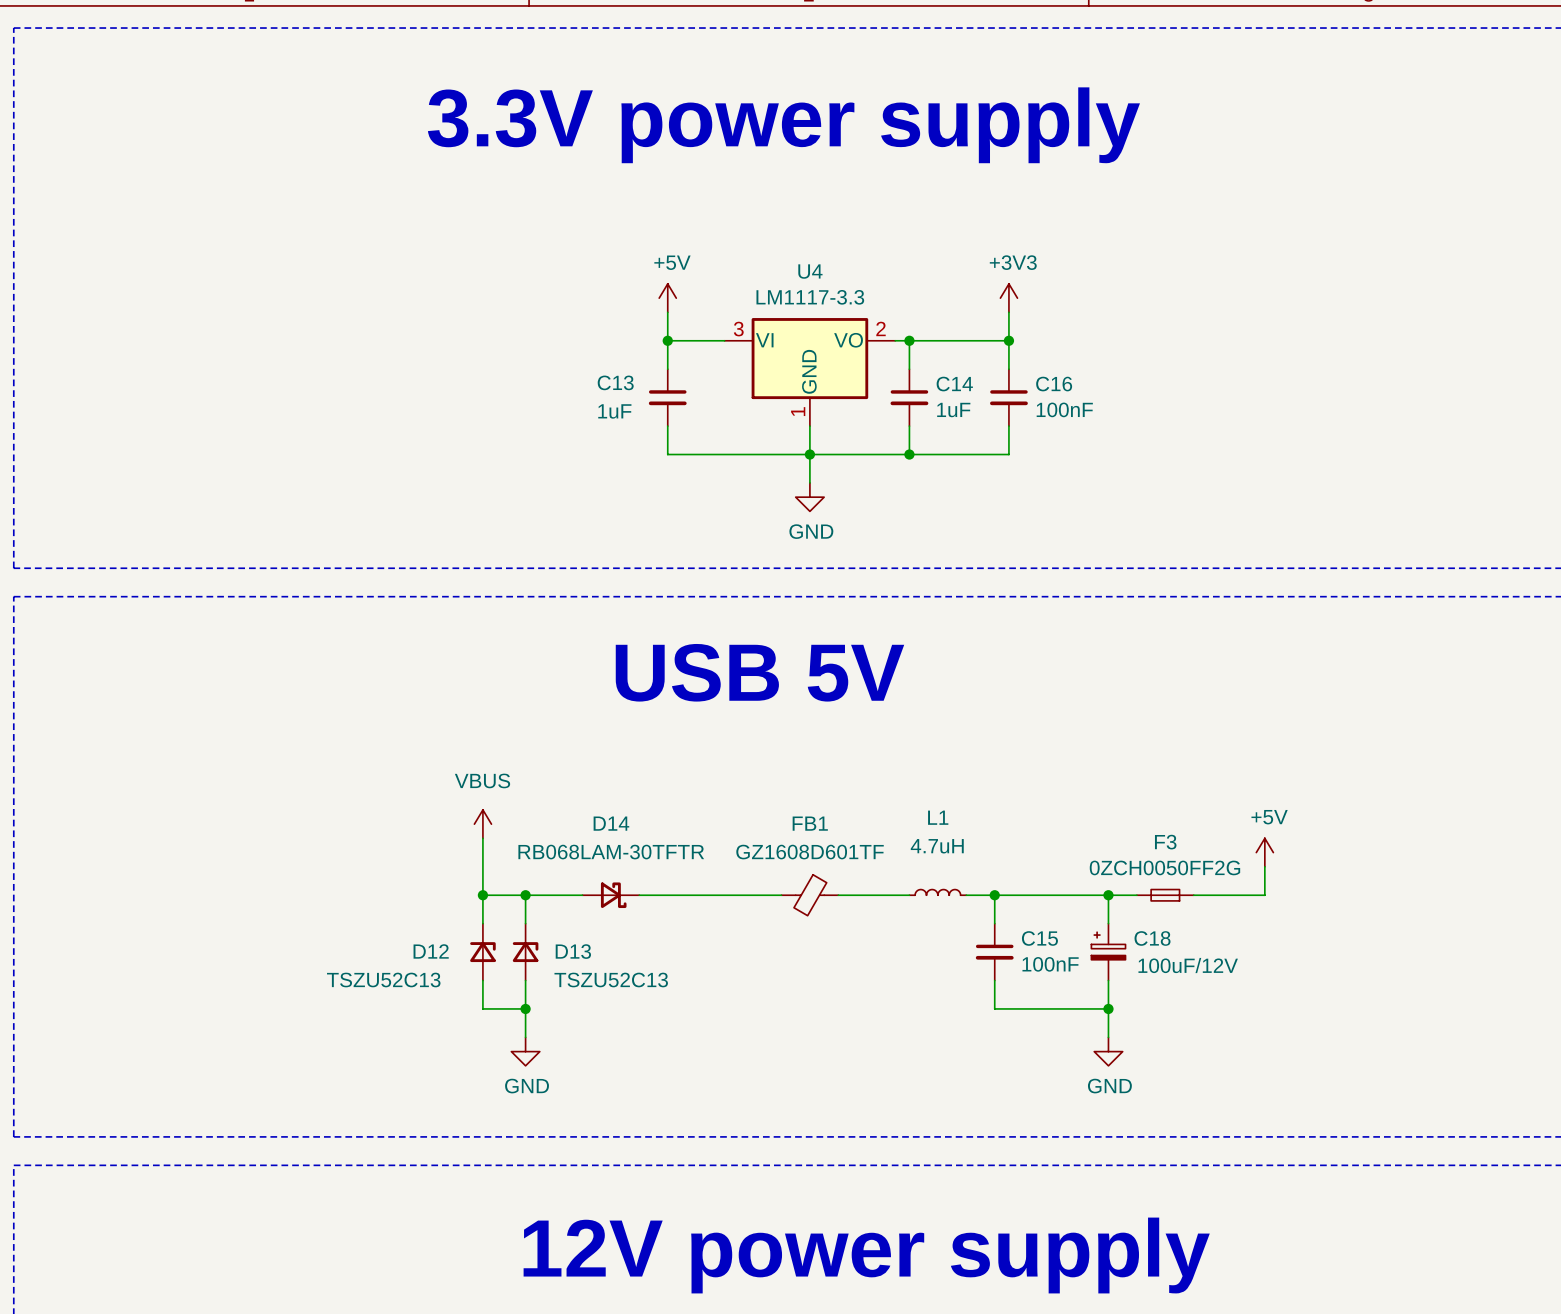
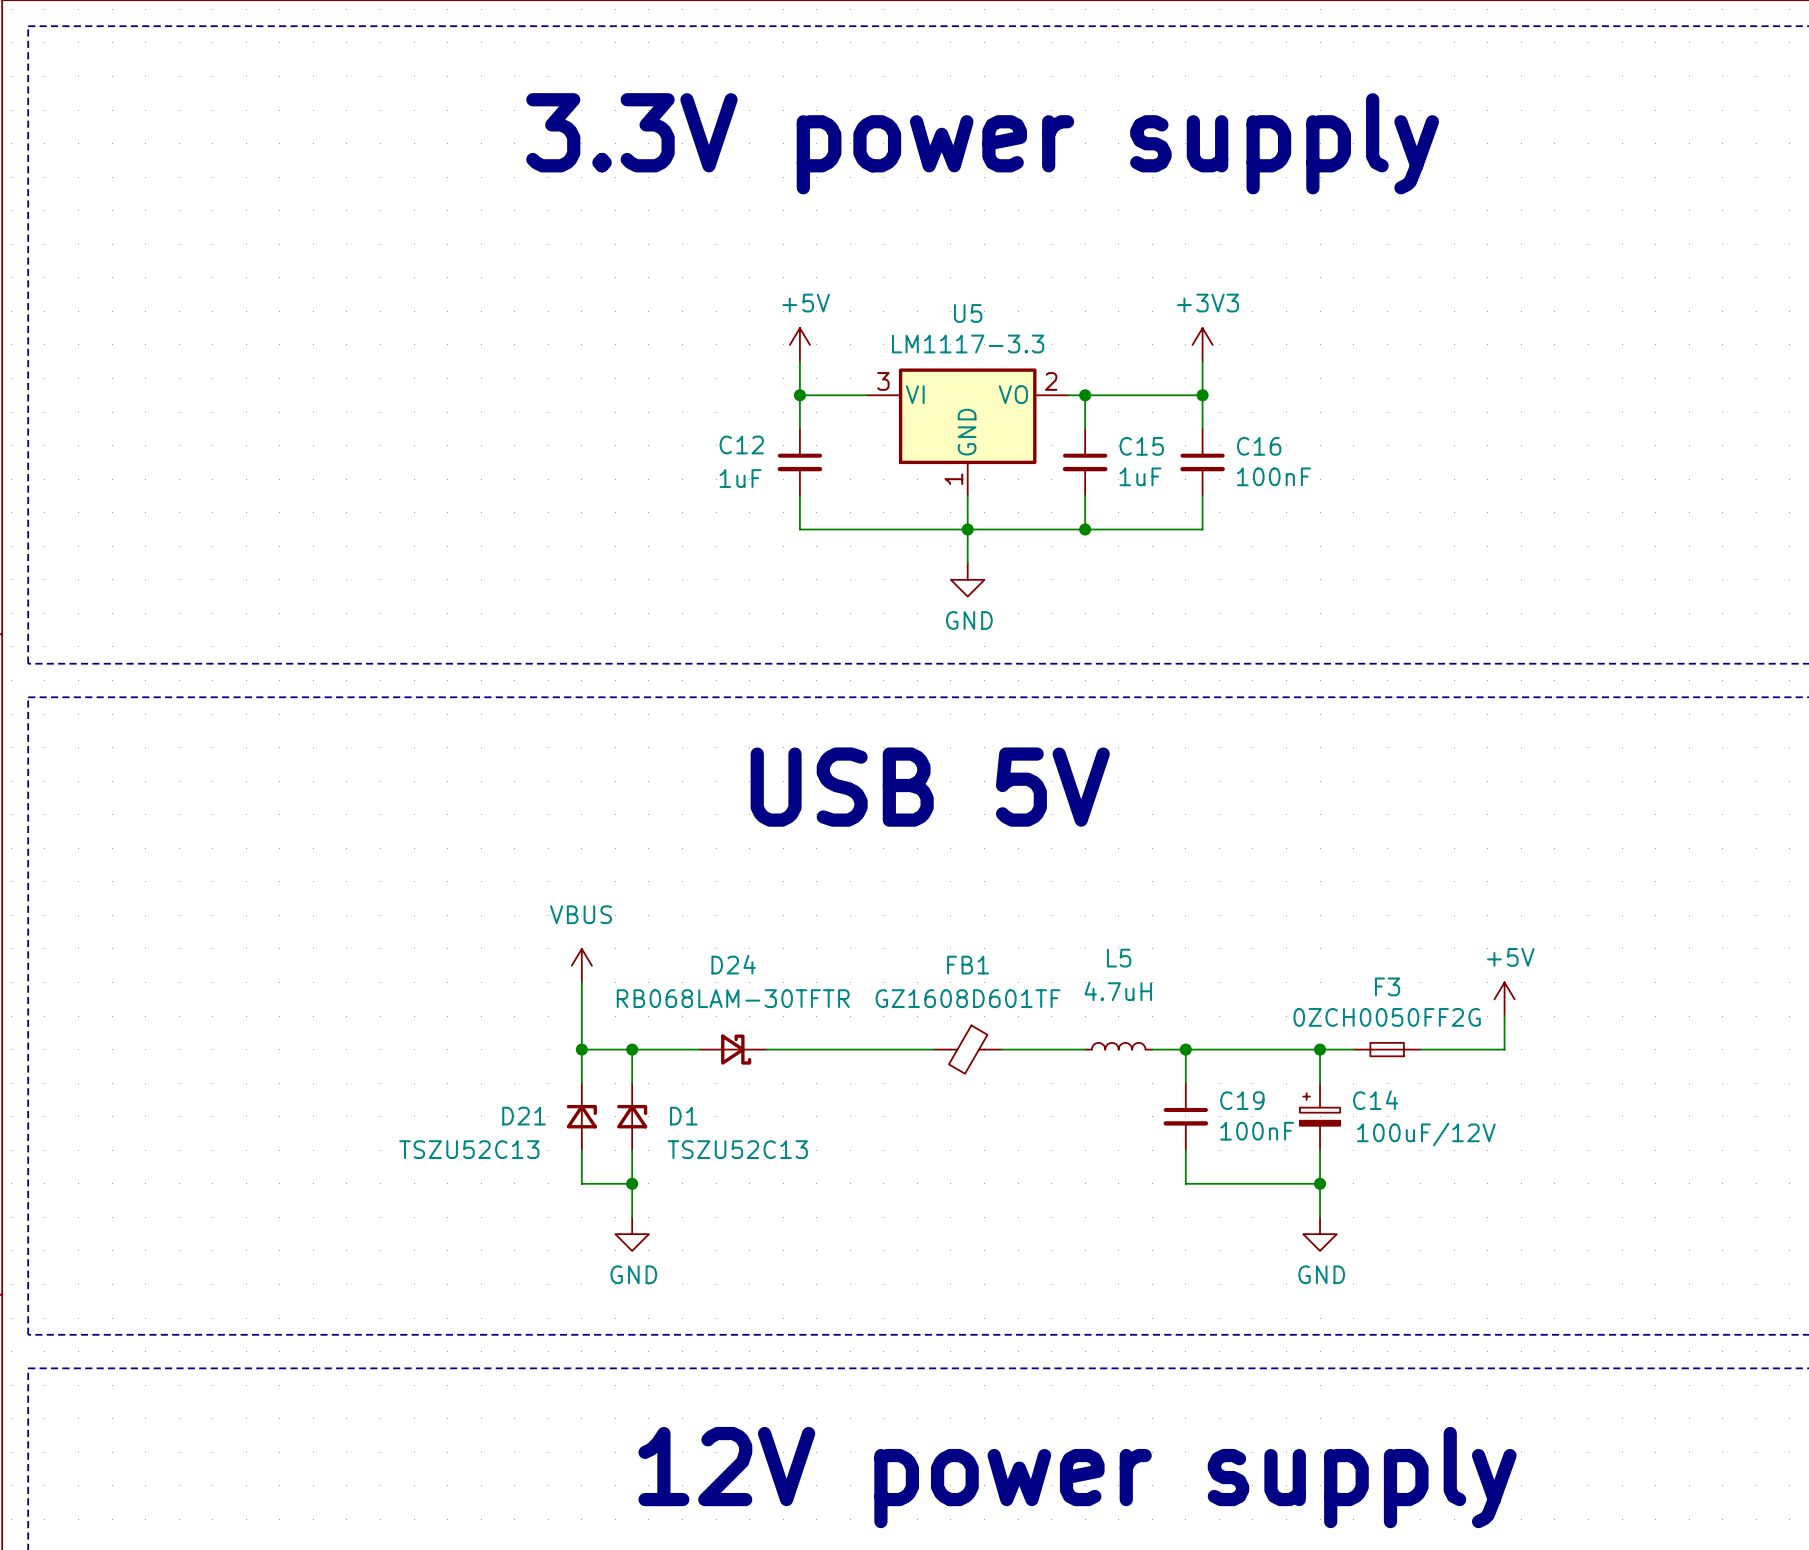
U4 name: U4 (810, 271) -> U5 (968, 313)
C13 name: C13 (615, 382) -> C12 (741, 444)
C14 name: C14 (954, 384) -> C15 (1141, 446)
L1 name: L1 (938, 817) -> L5 (1119, 958)
D14 name: D14 (611, 823) -> D24 (733, 964)
C15 name: C15 (1039, 938) -> C19 (1242, 1100)
C18 name: C18 (1152, 938) -> C14 (1375, 1100)
D12 name: D12 (431, 951) -> D21 (524, 1116)
D13 name: D13 (573, 951) -> D1 (683, 1116)

